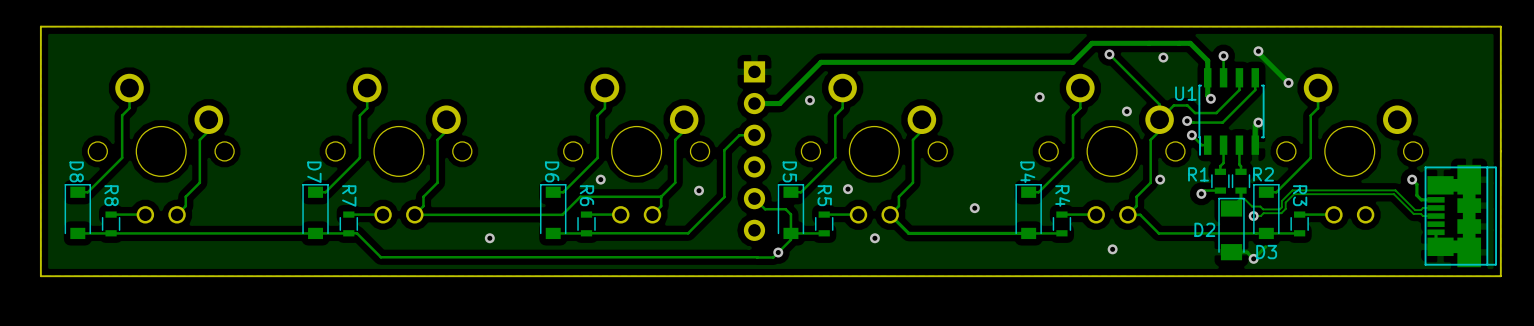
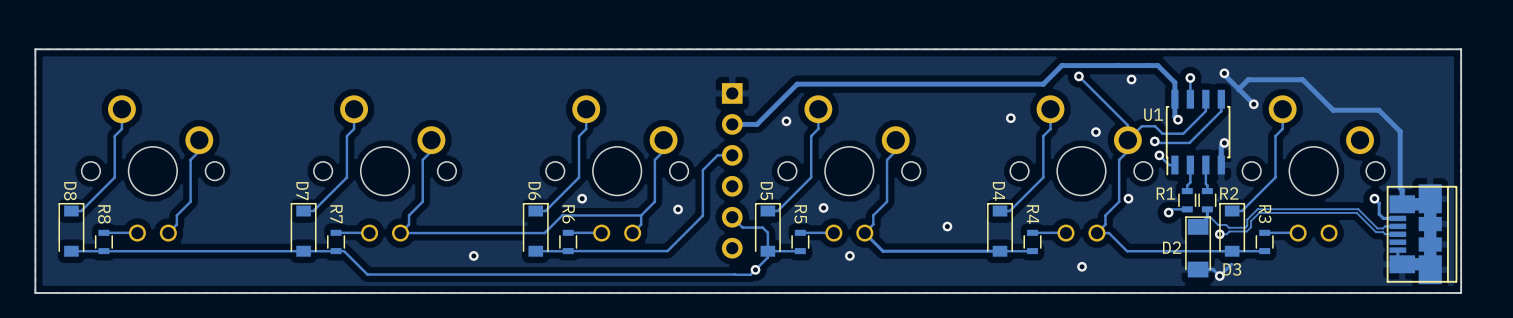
track: none -> (1238, 89) (1248, 79) (1302, 79) (1333, 110) (1378, 110) (1400, 131) (1400, 188) (1402, 190) (1402, 204)

